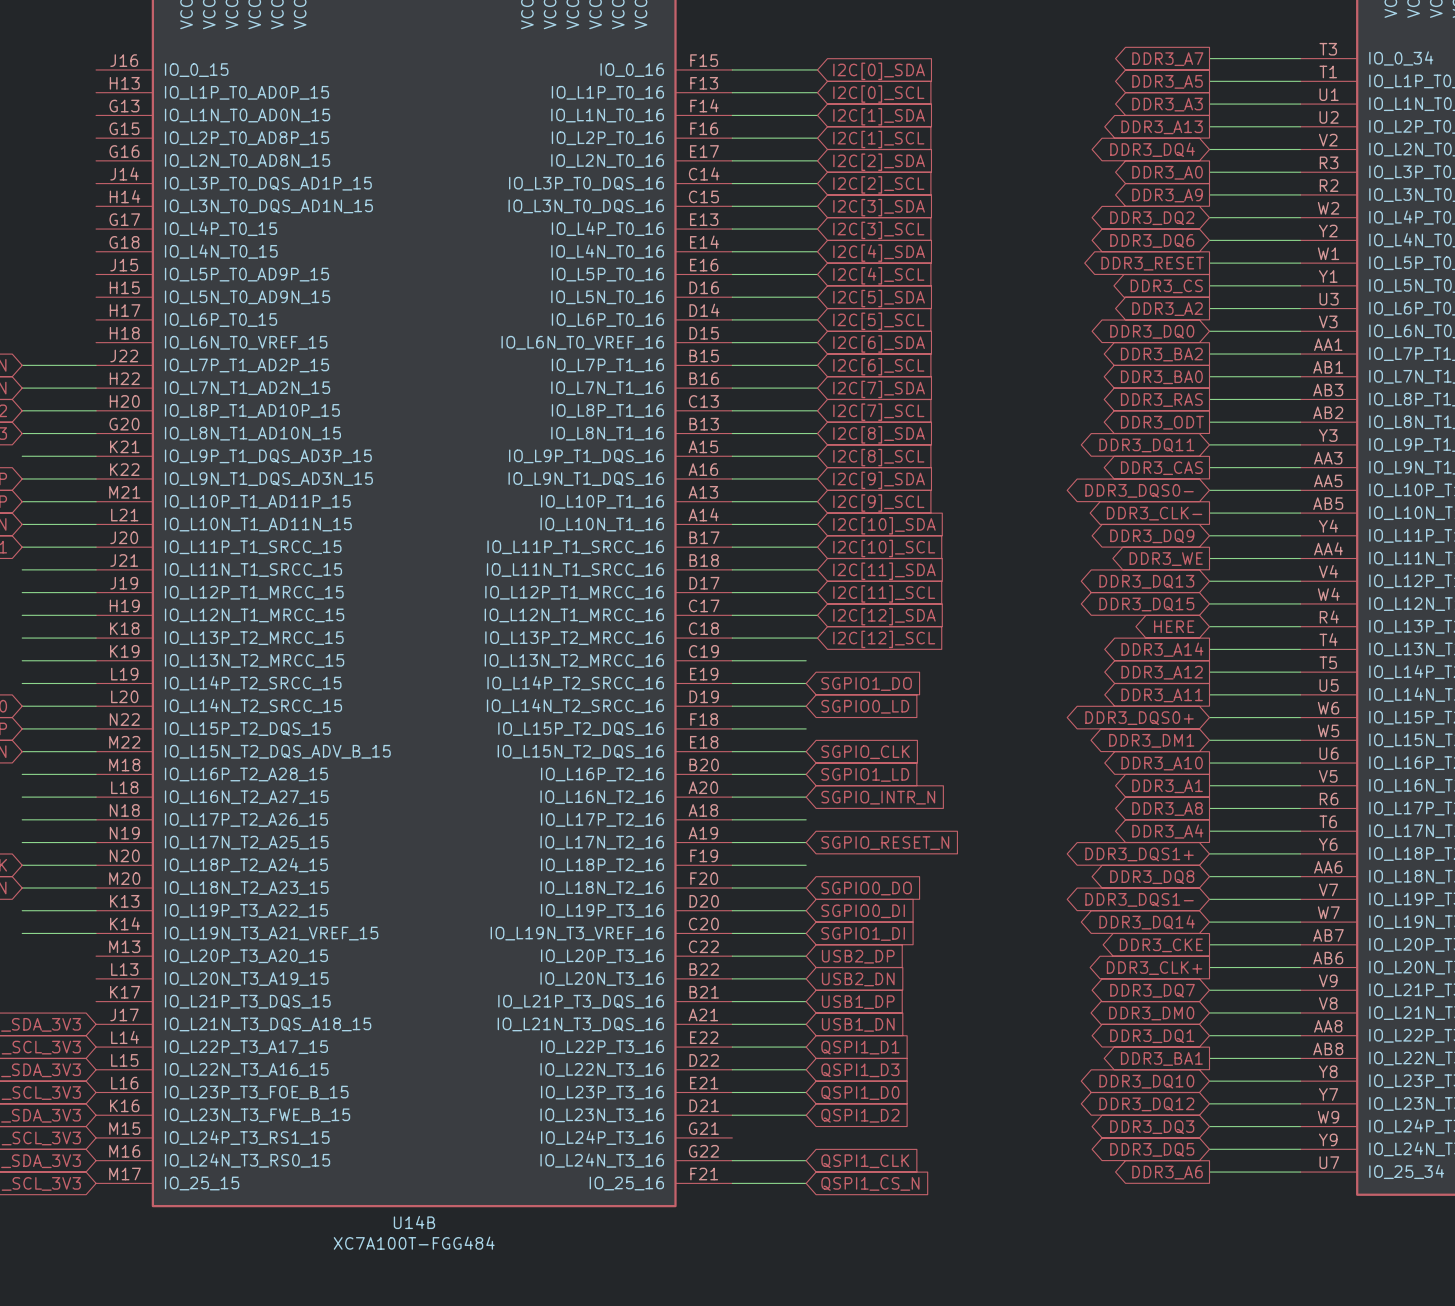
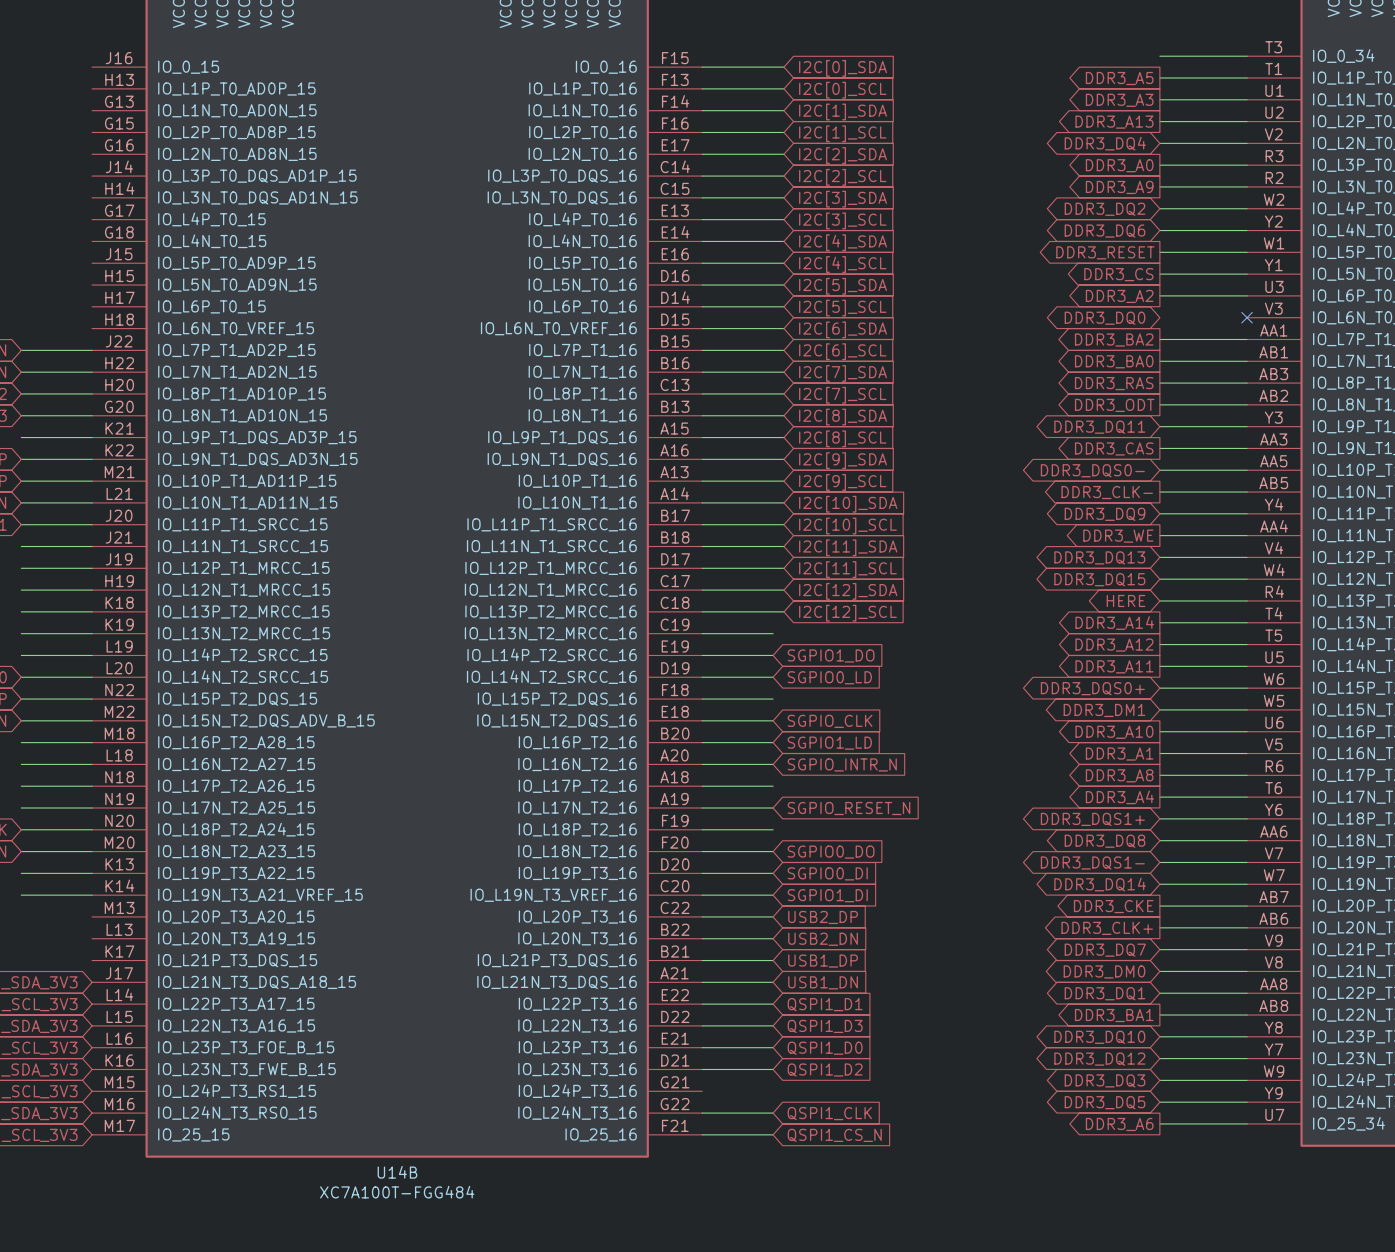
global label: DDR3_A7 (1167, 59) -> none
wire: (1209, 331) (1300, 331) -> none
no-connect mark: none -> (1247, 317)

